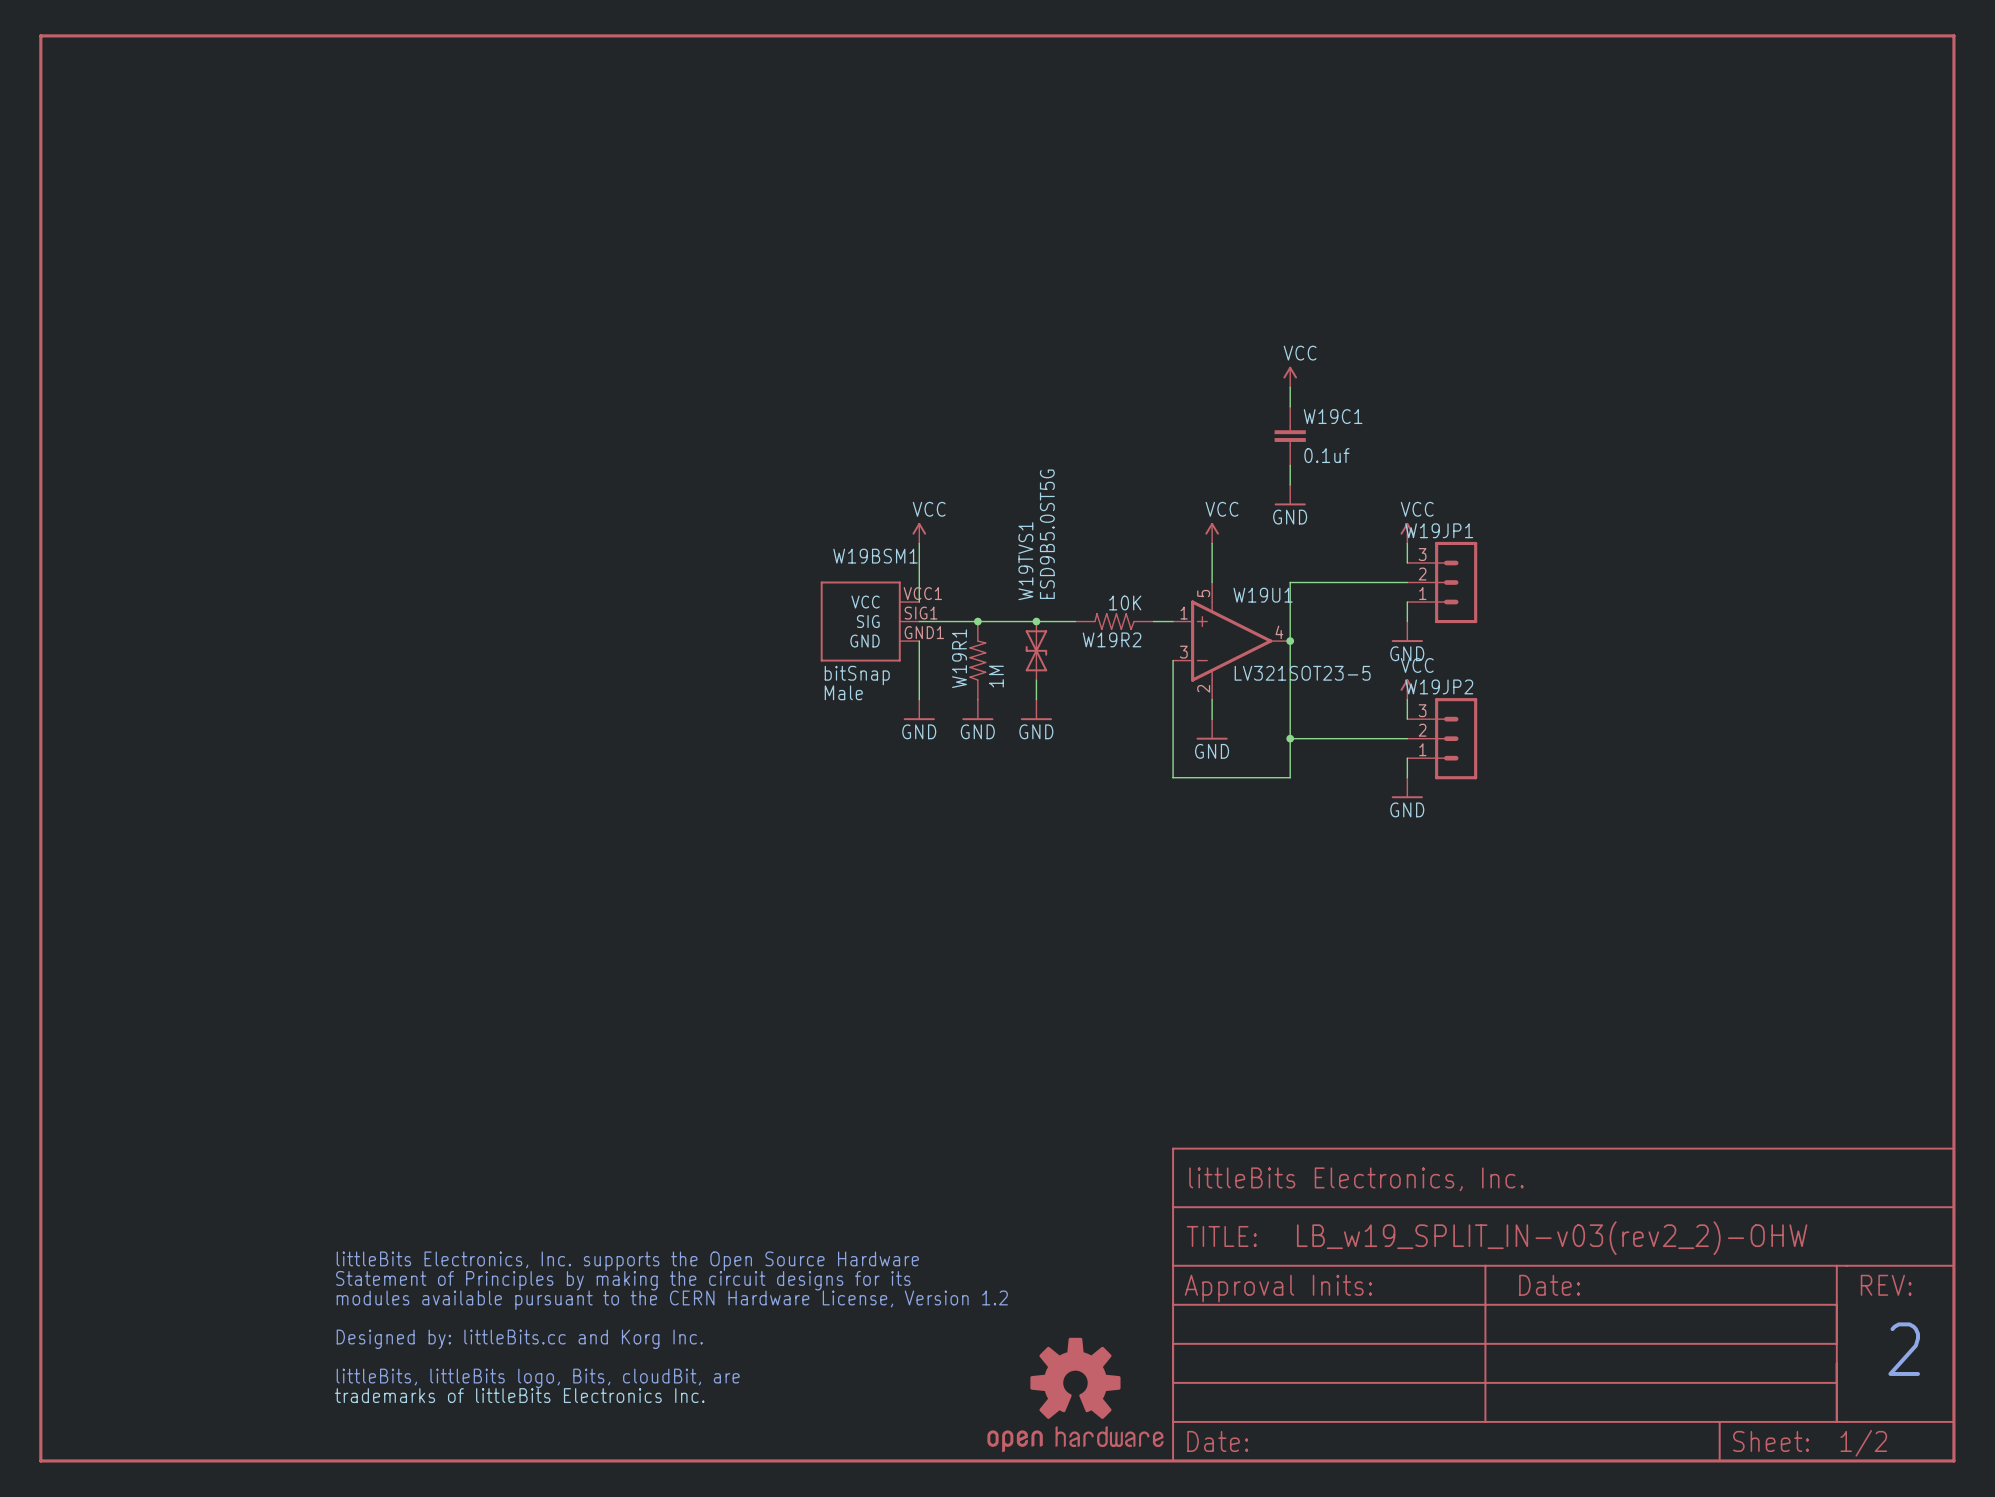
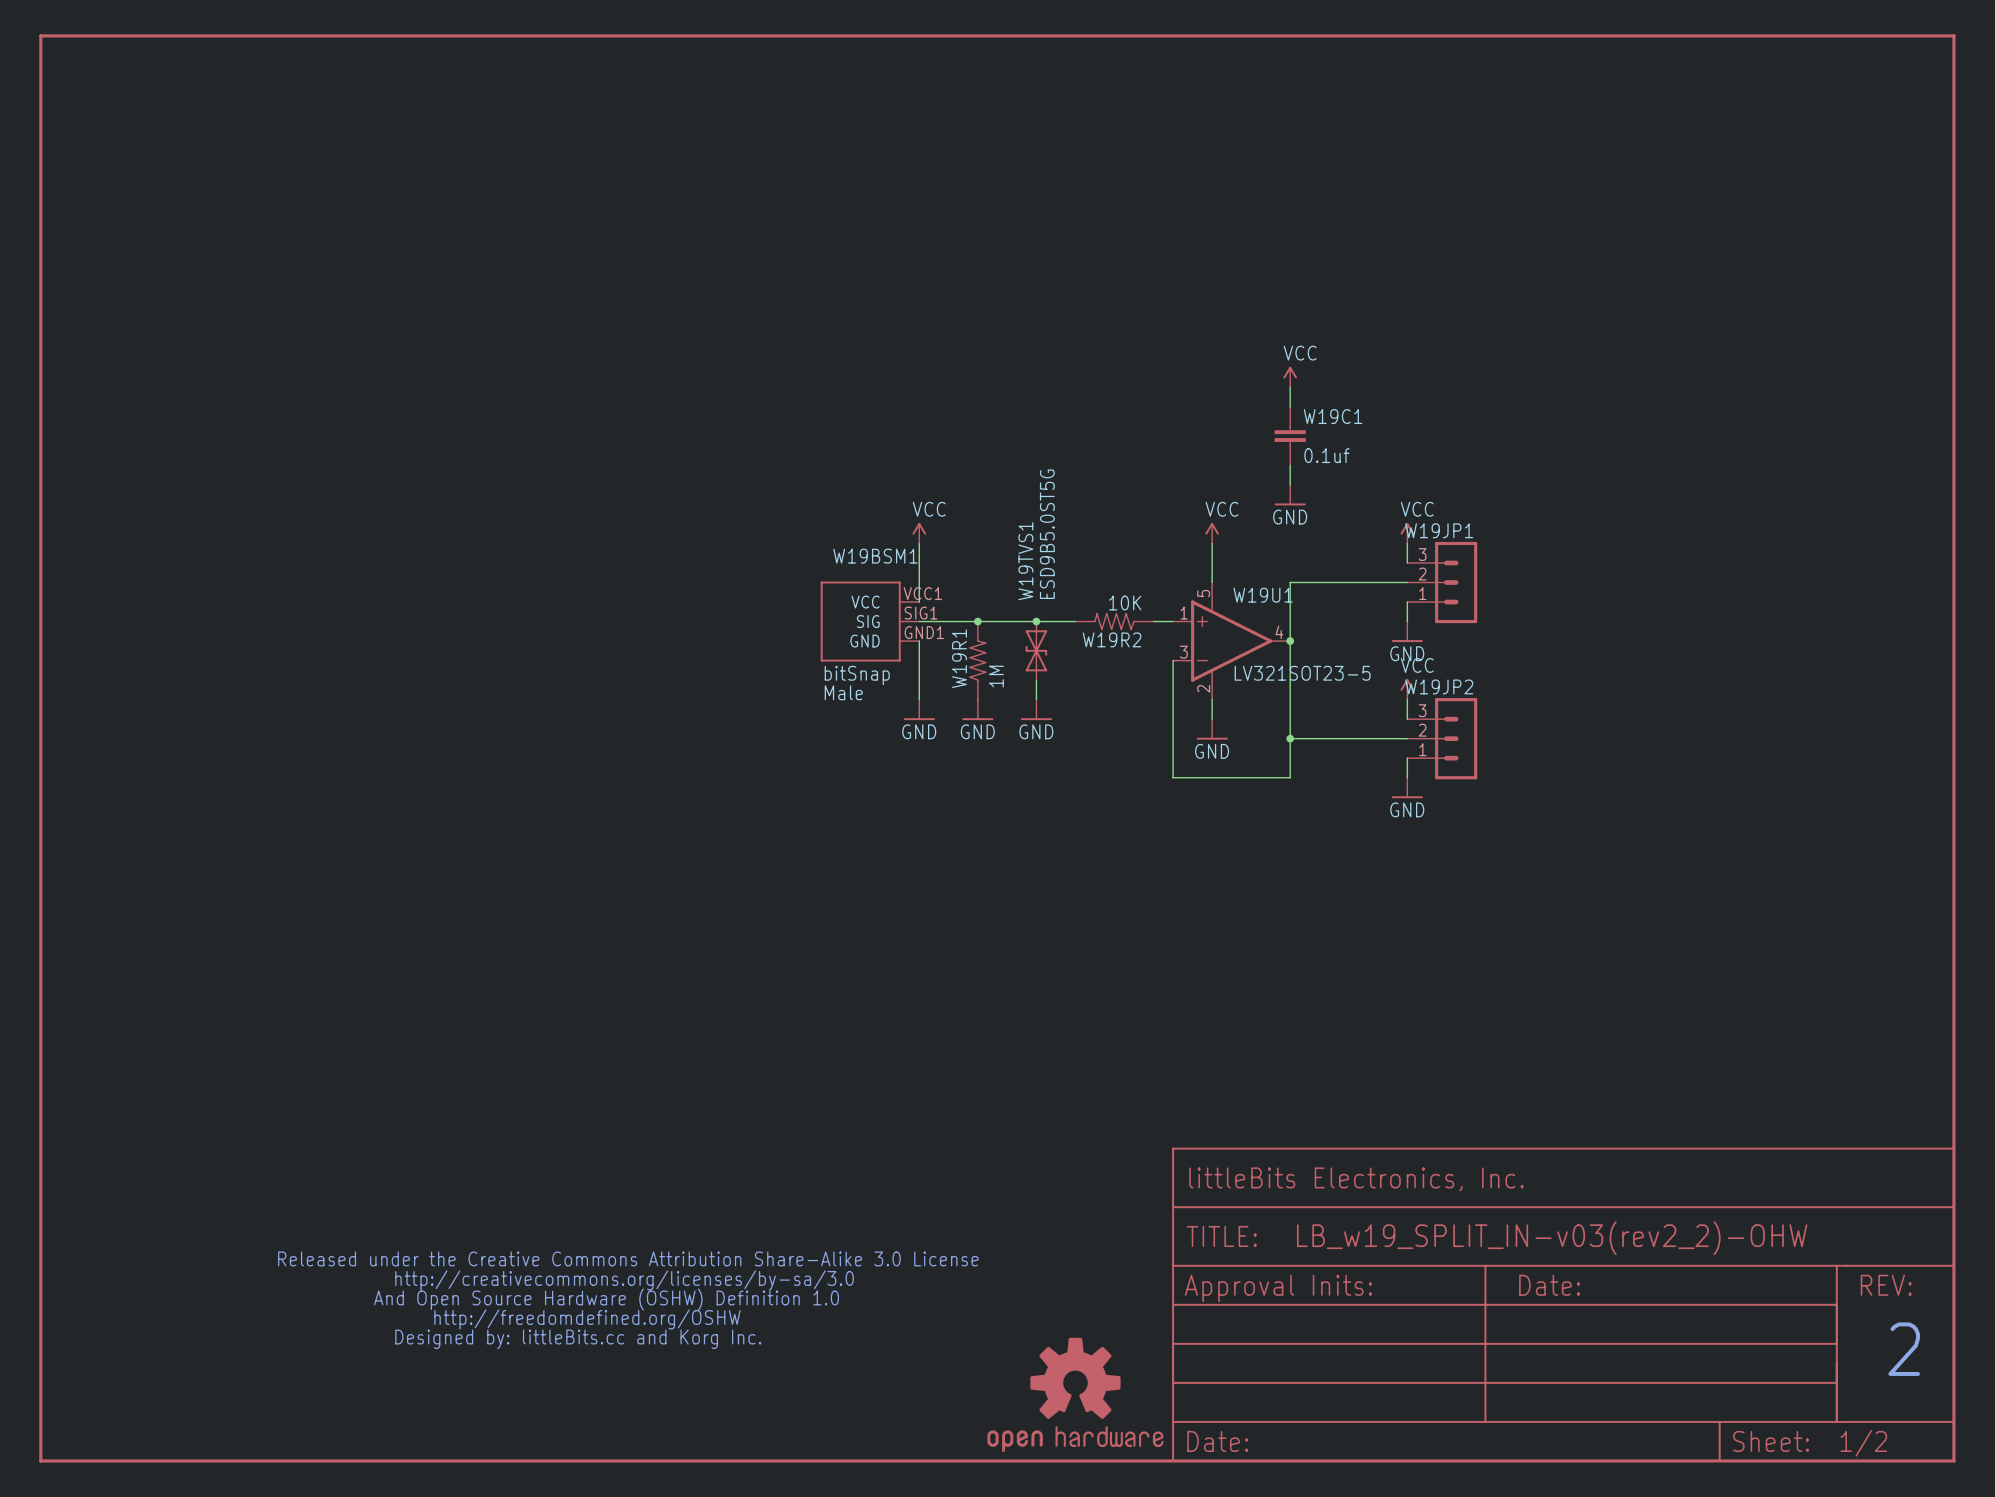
part: none -> (628, 1300)
part: (671, 1327) -> none

